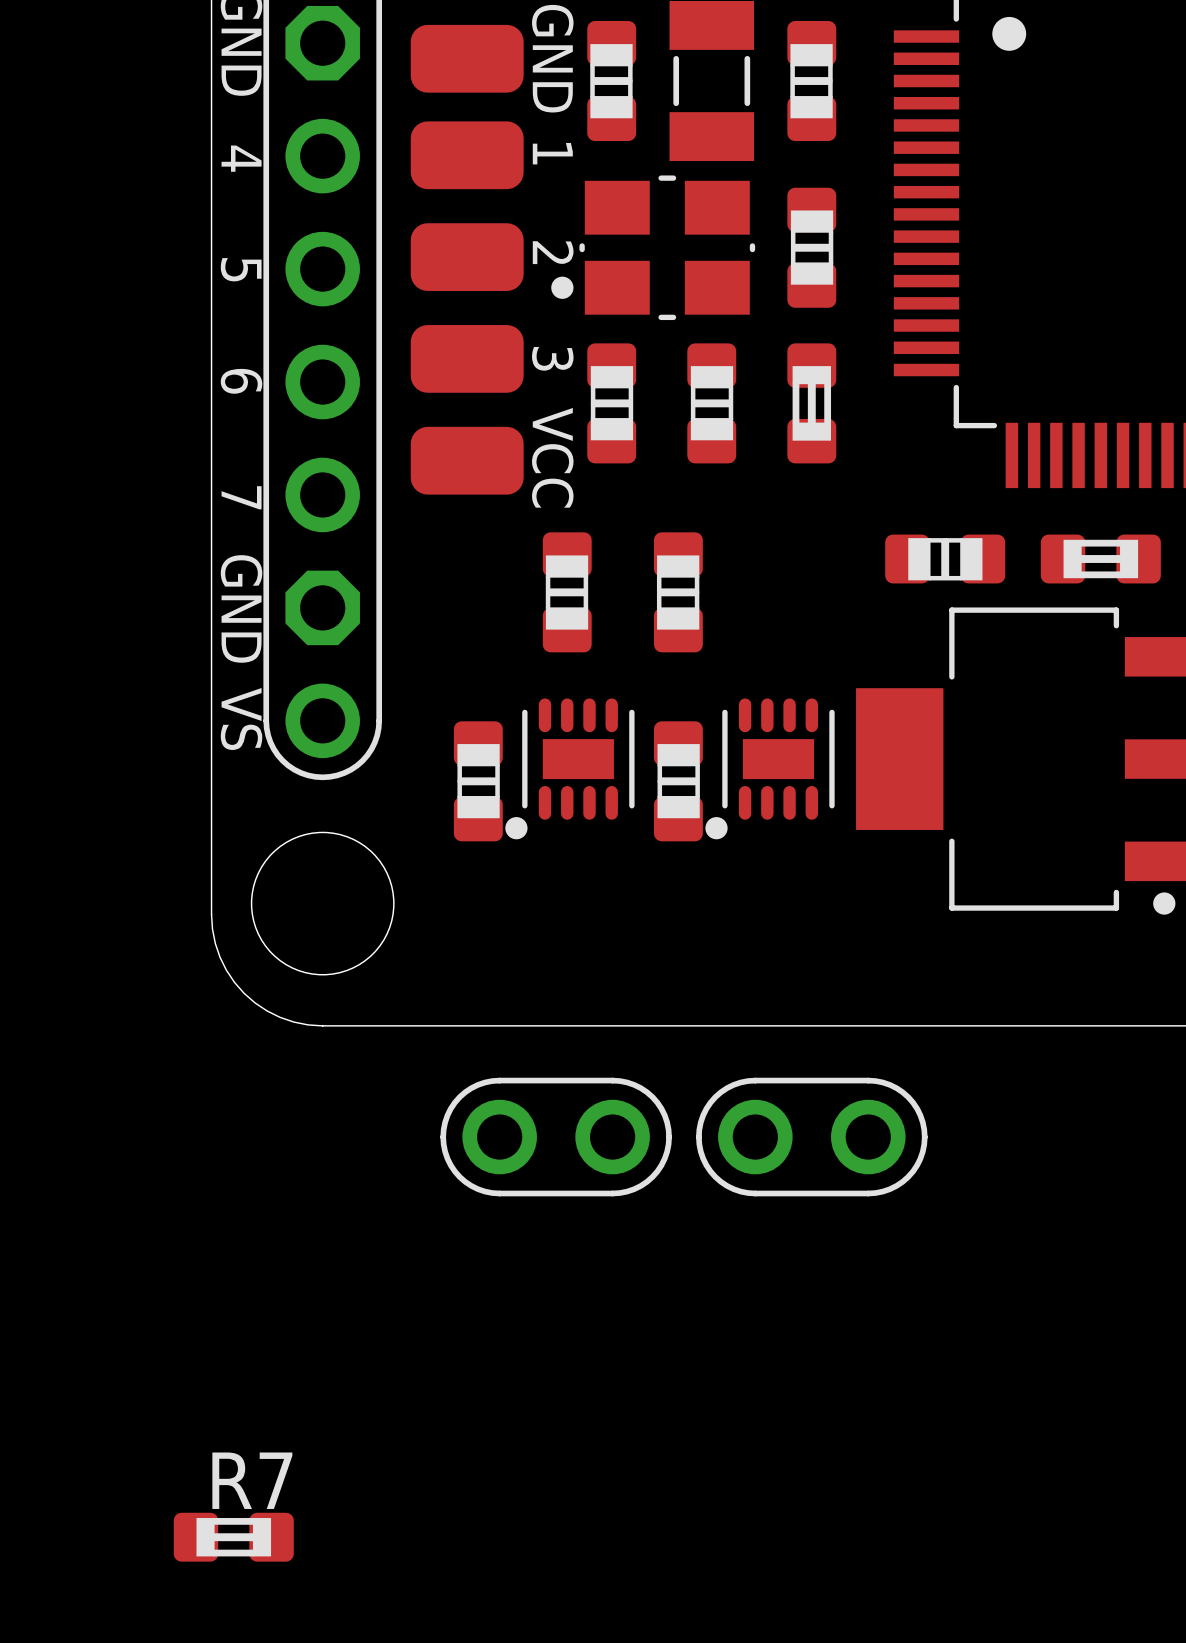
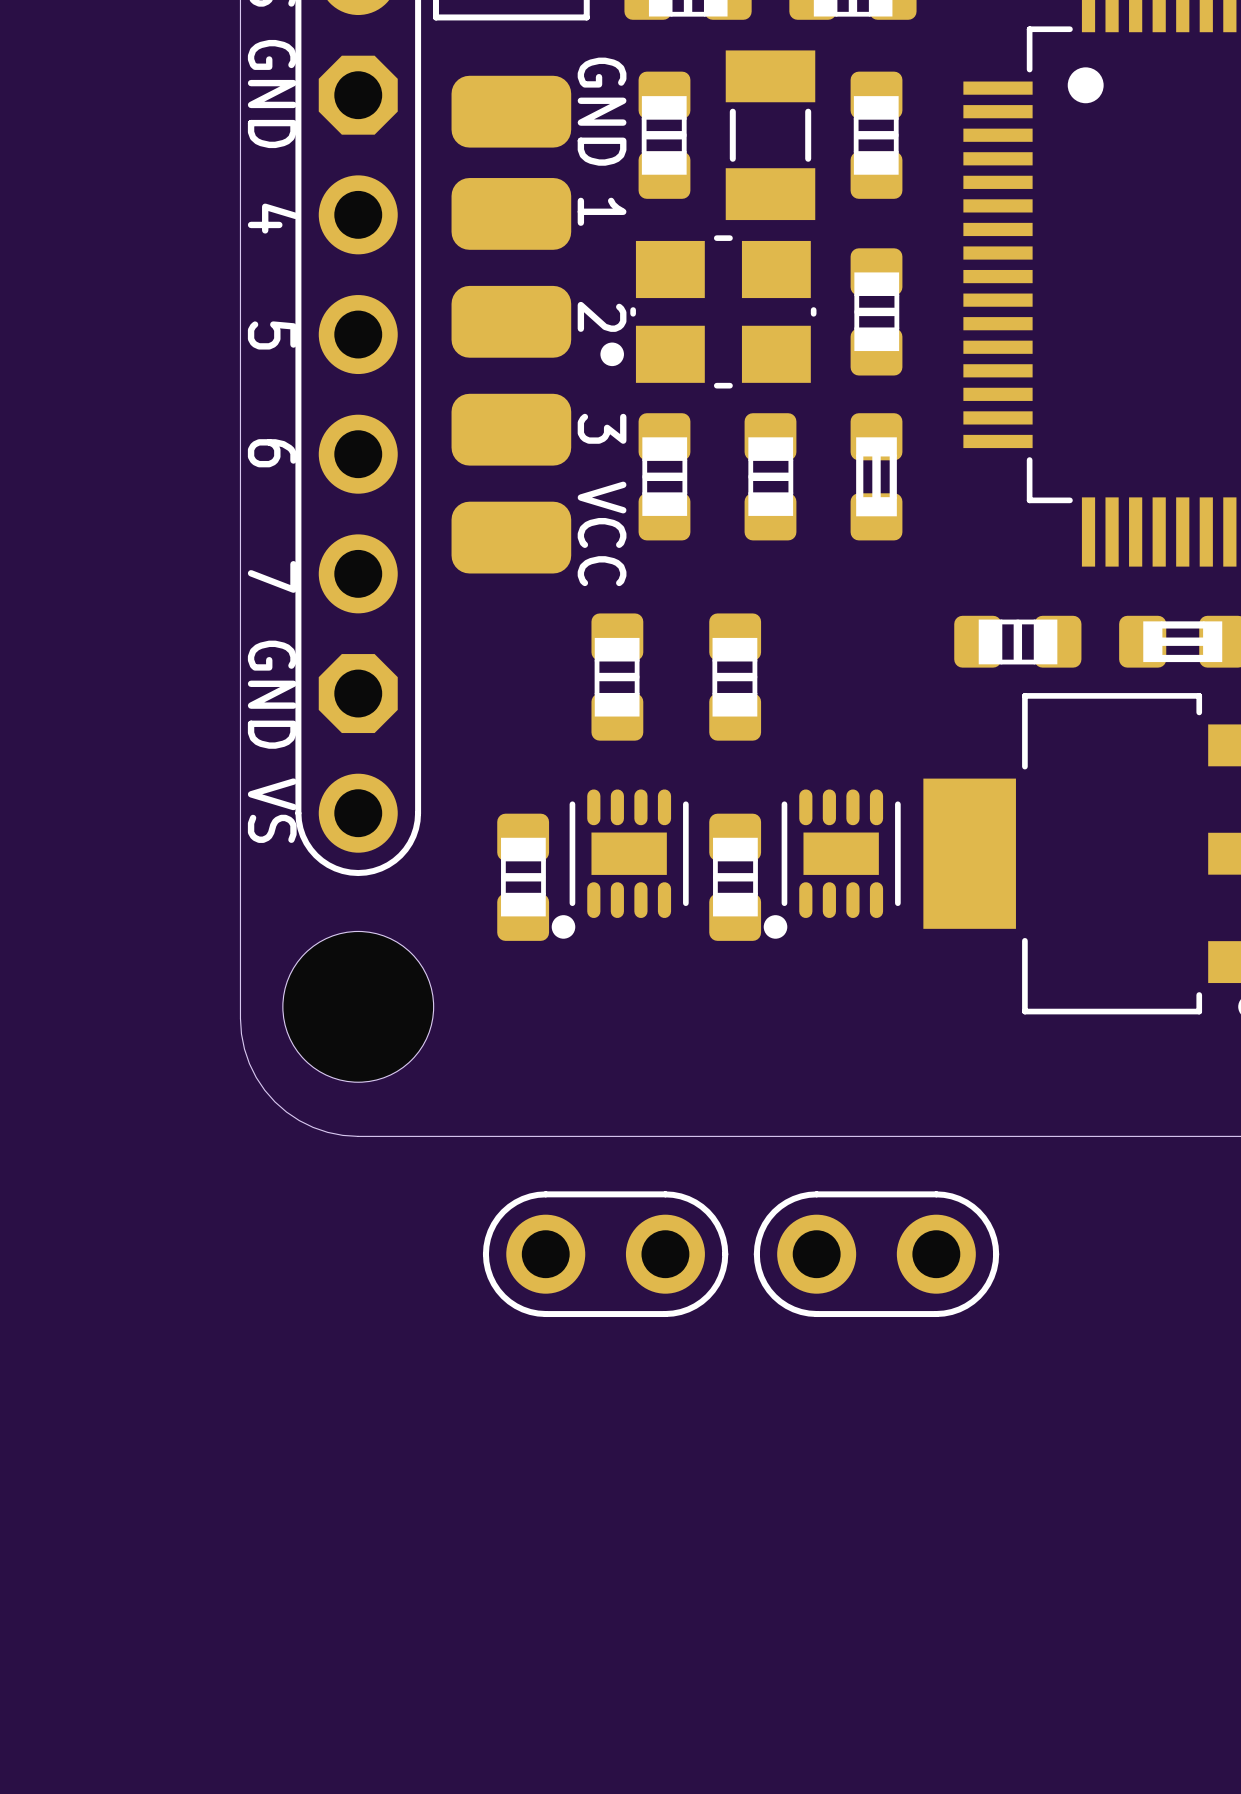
R7: (233, 1537) -> none

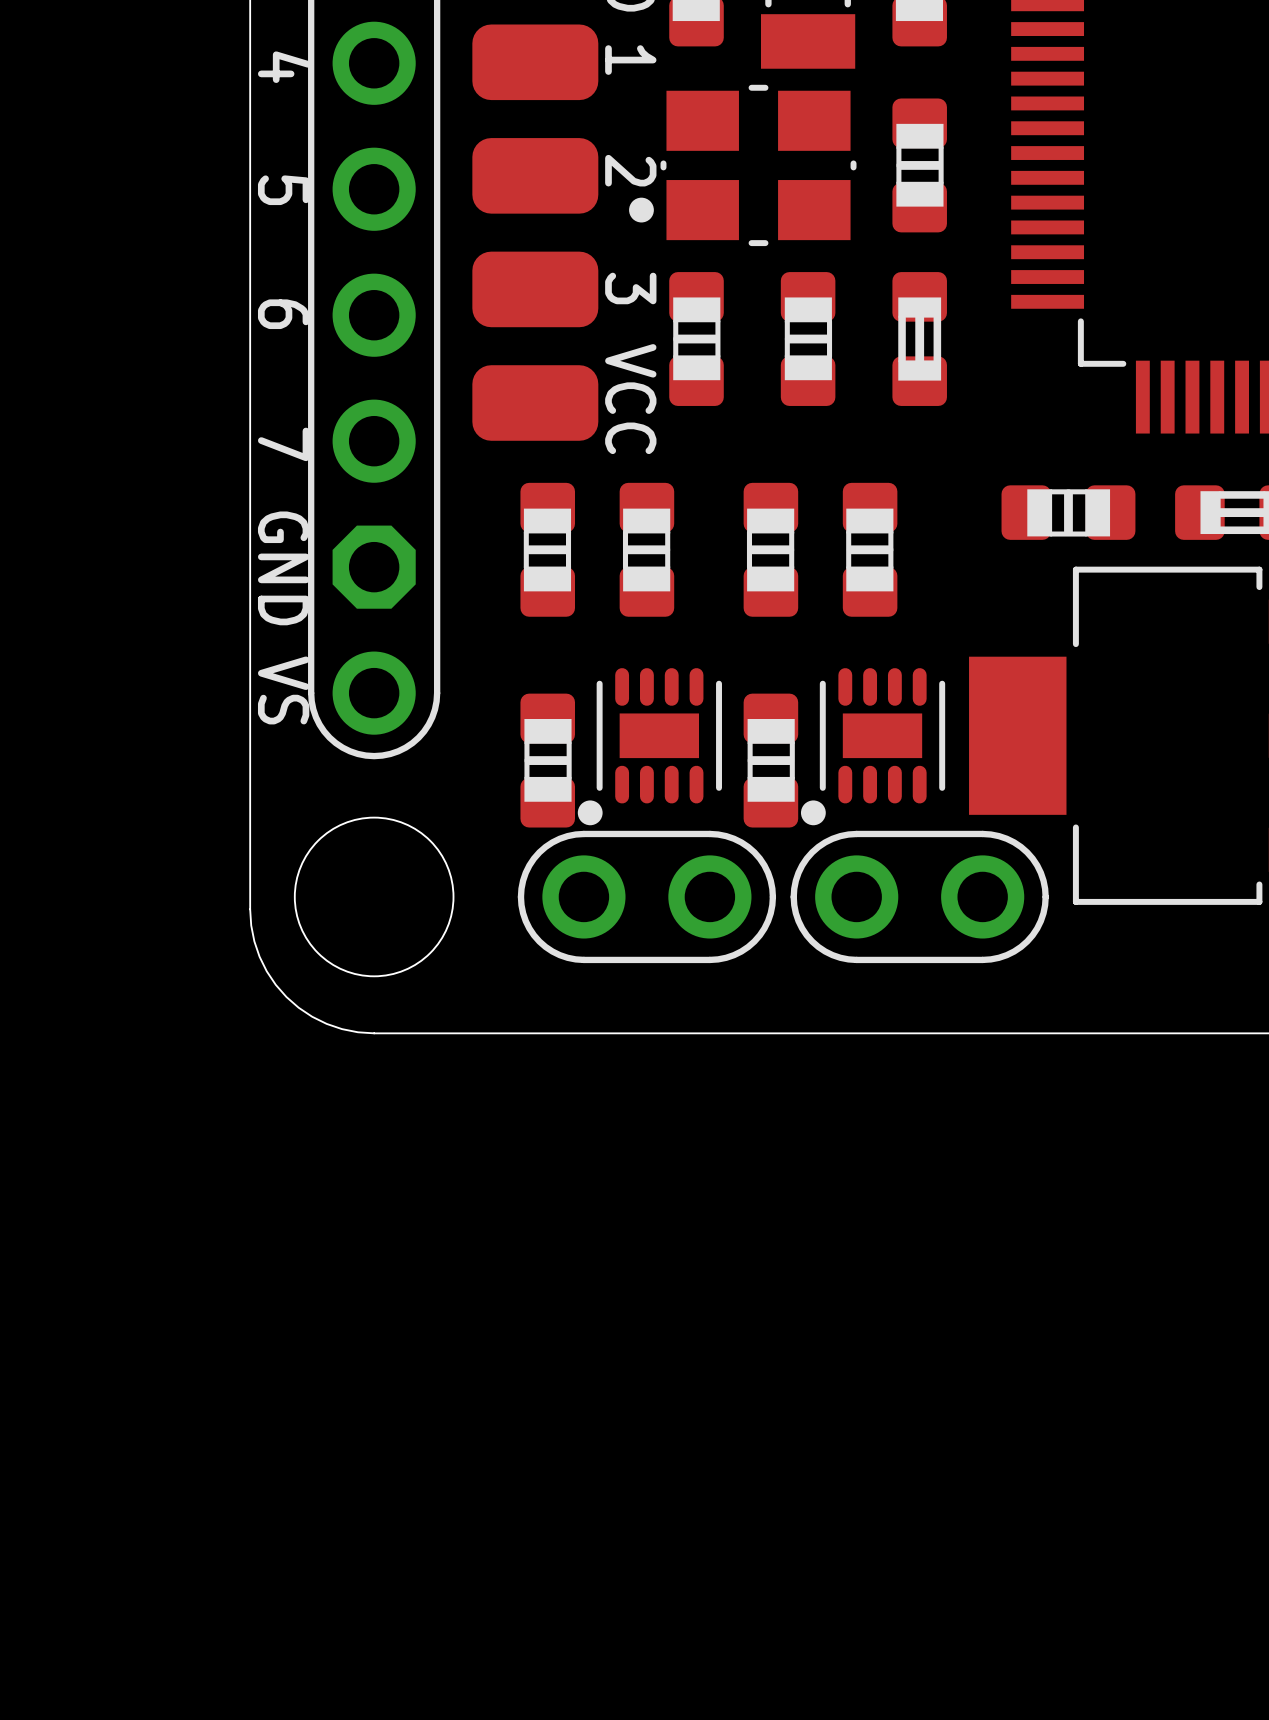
part: none -> (547, 549)
part: none -> (870, 549)
part: none -> (646, 896)
part: none -> (919, 896)
part: (605, 1254) -> none
part: (876, 1254) -> none

